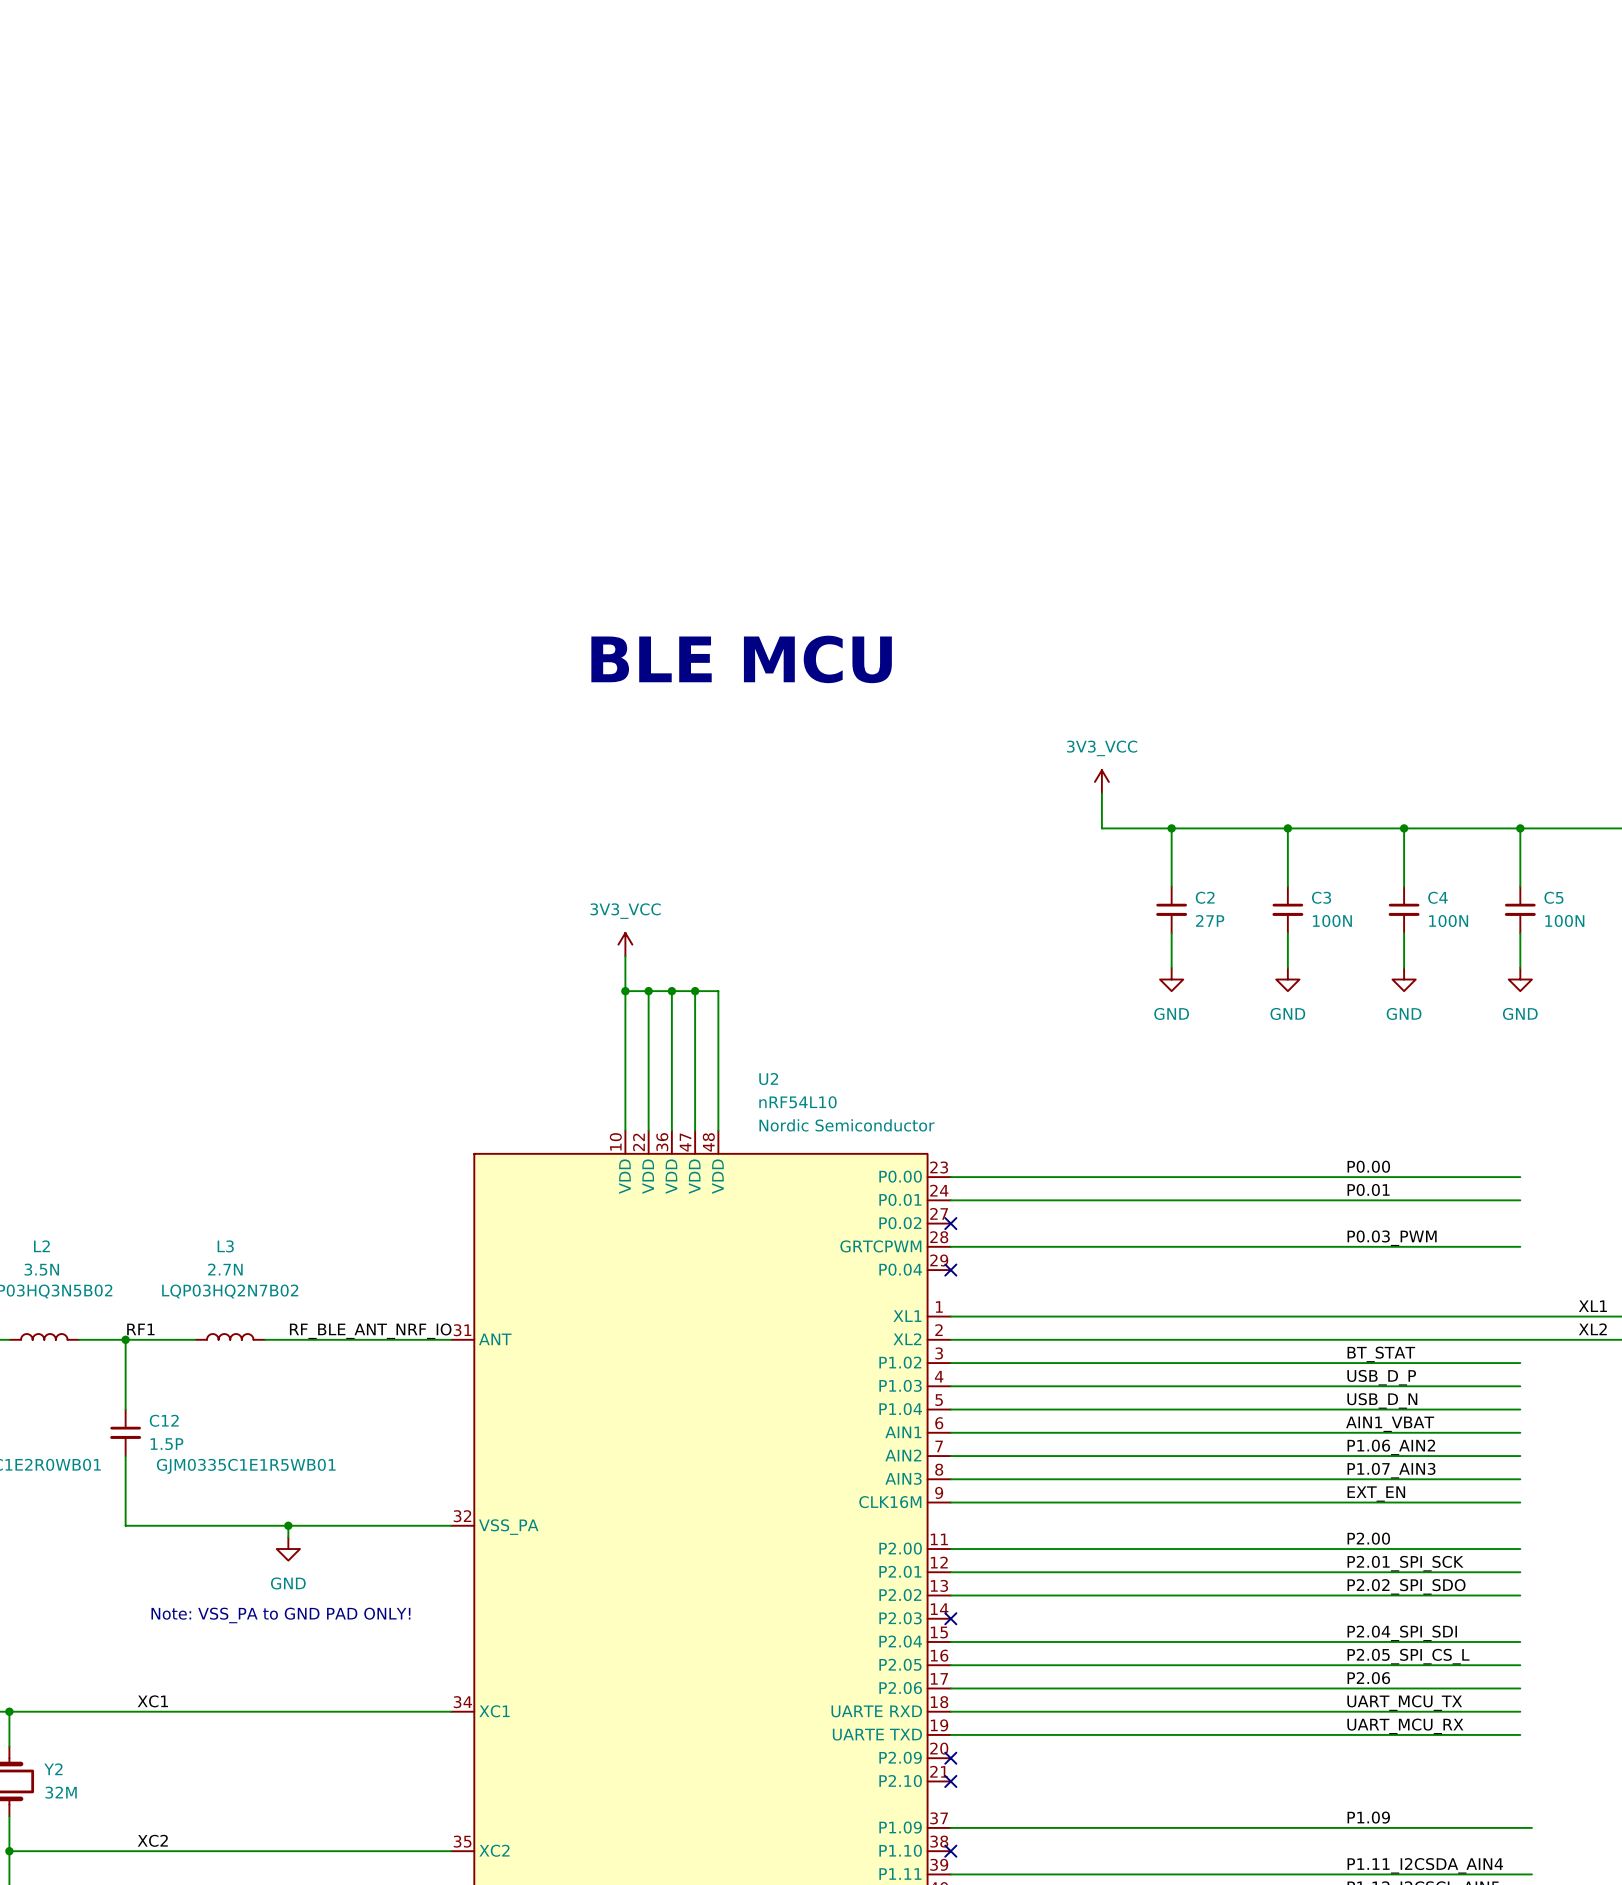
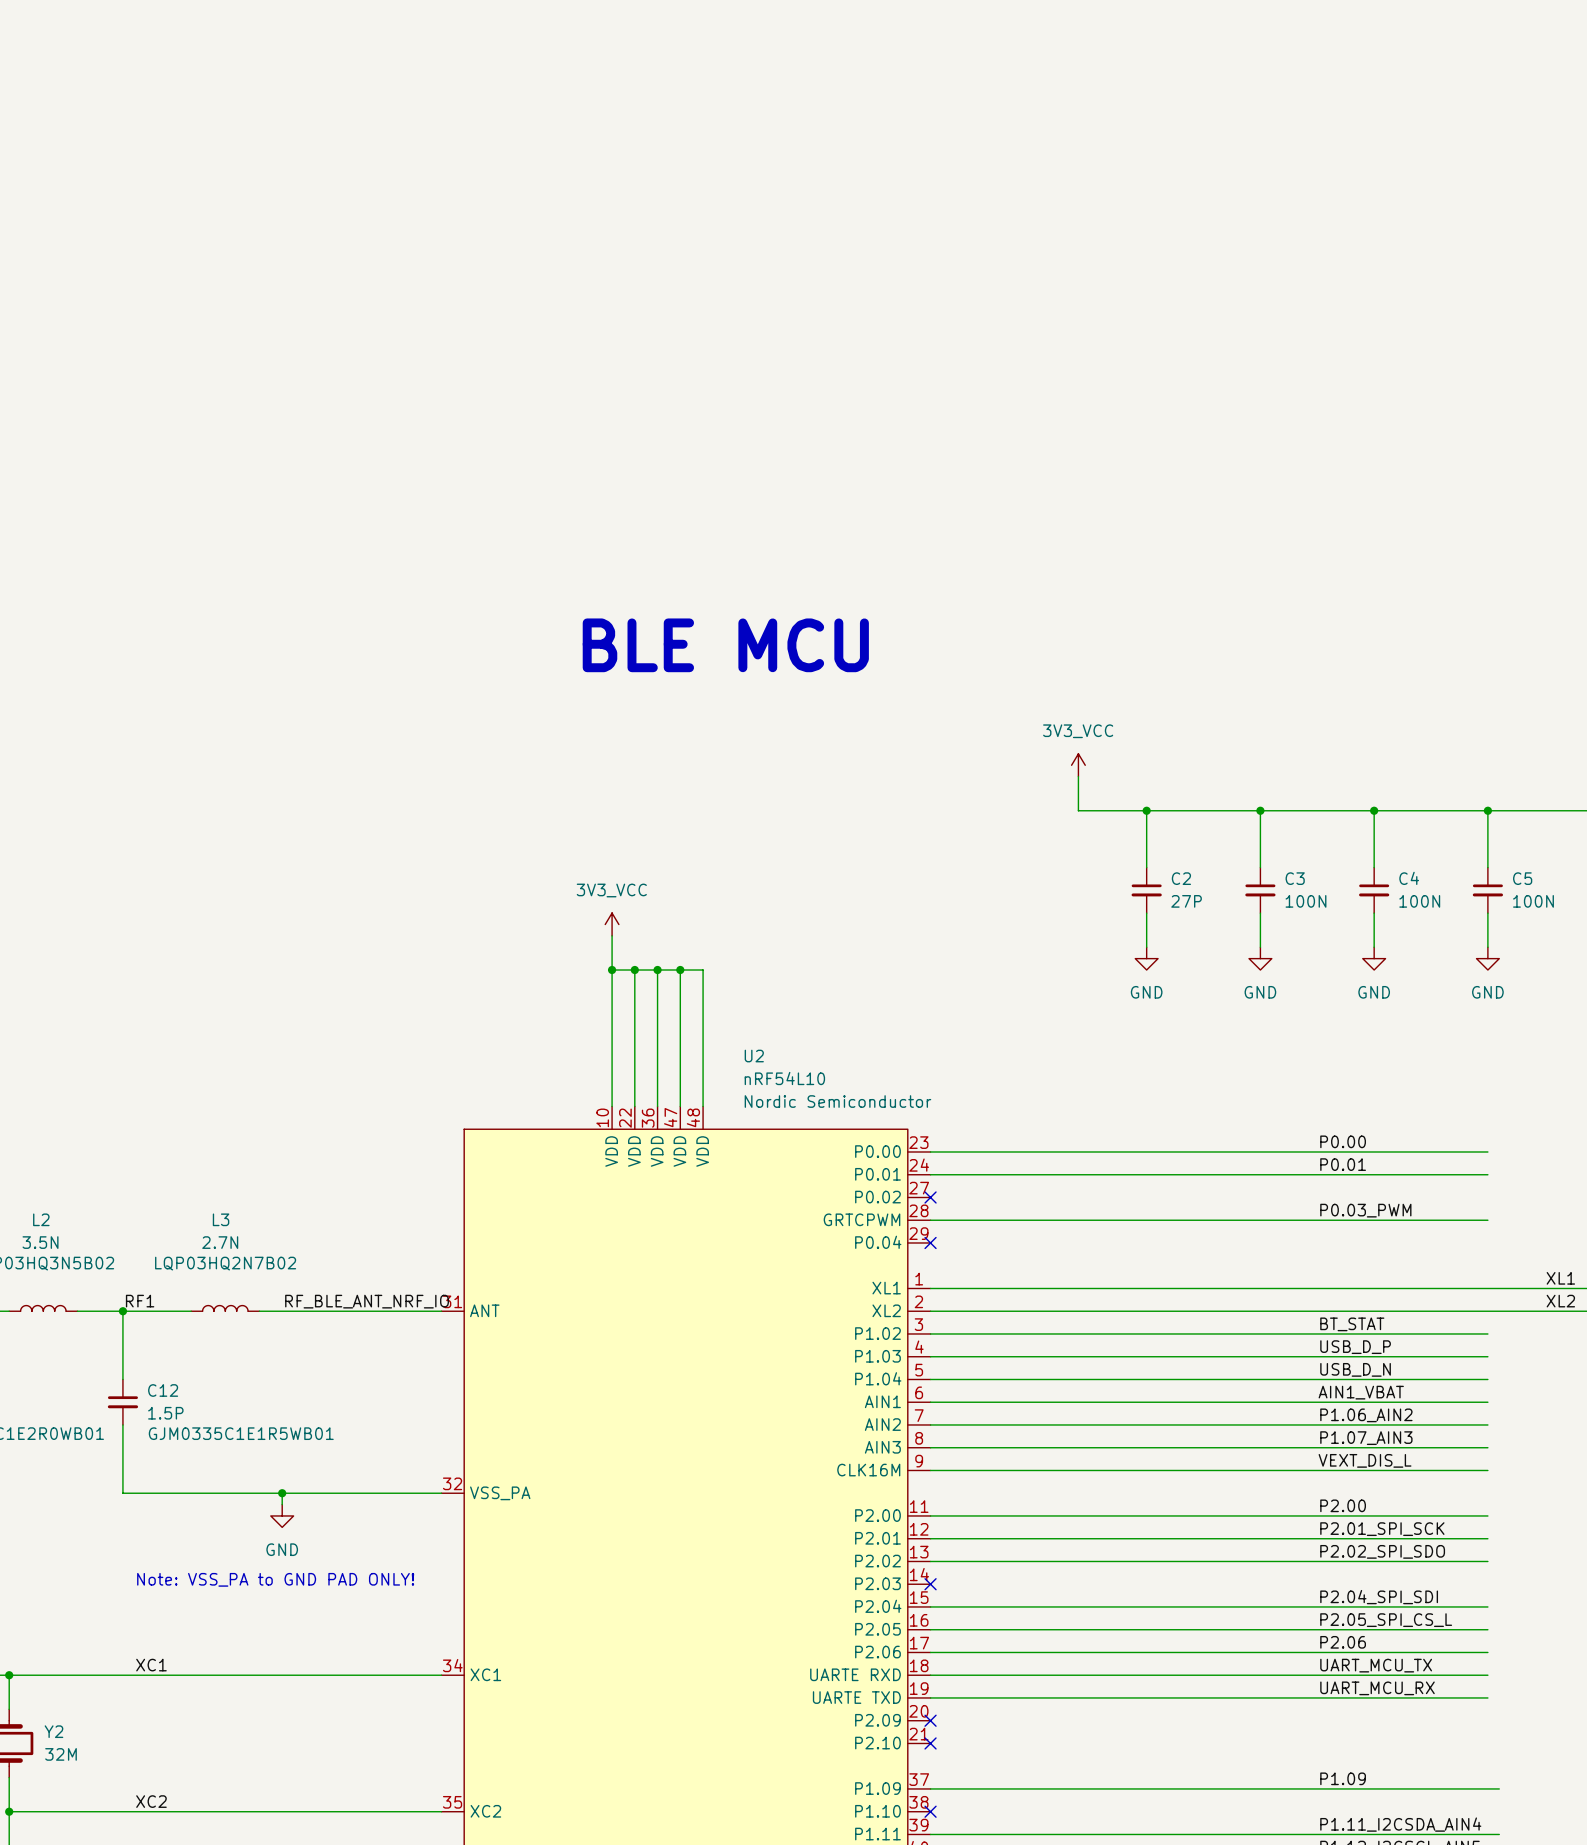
label: EXT_EN (1376, 1494) -> VEXT_DIS_L (1365, 1460)

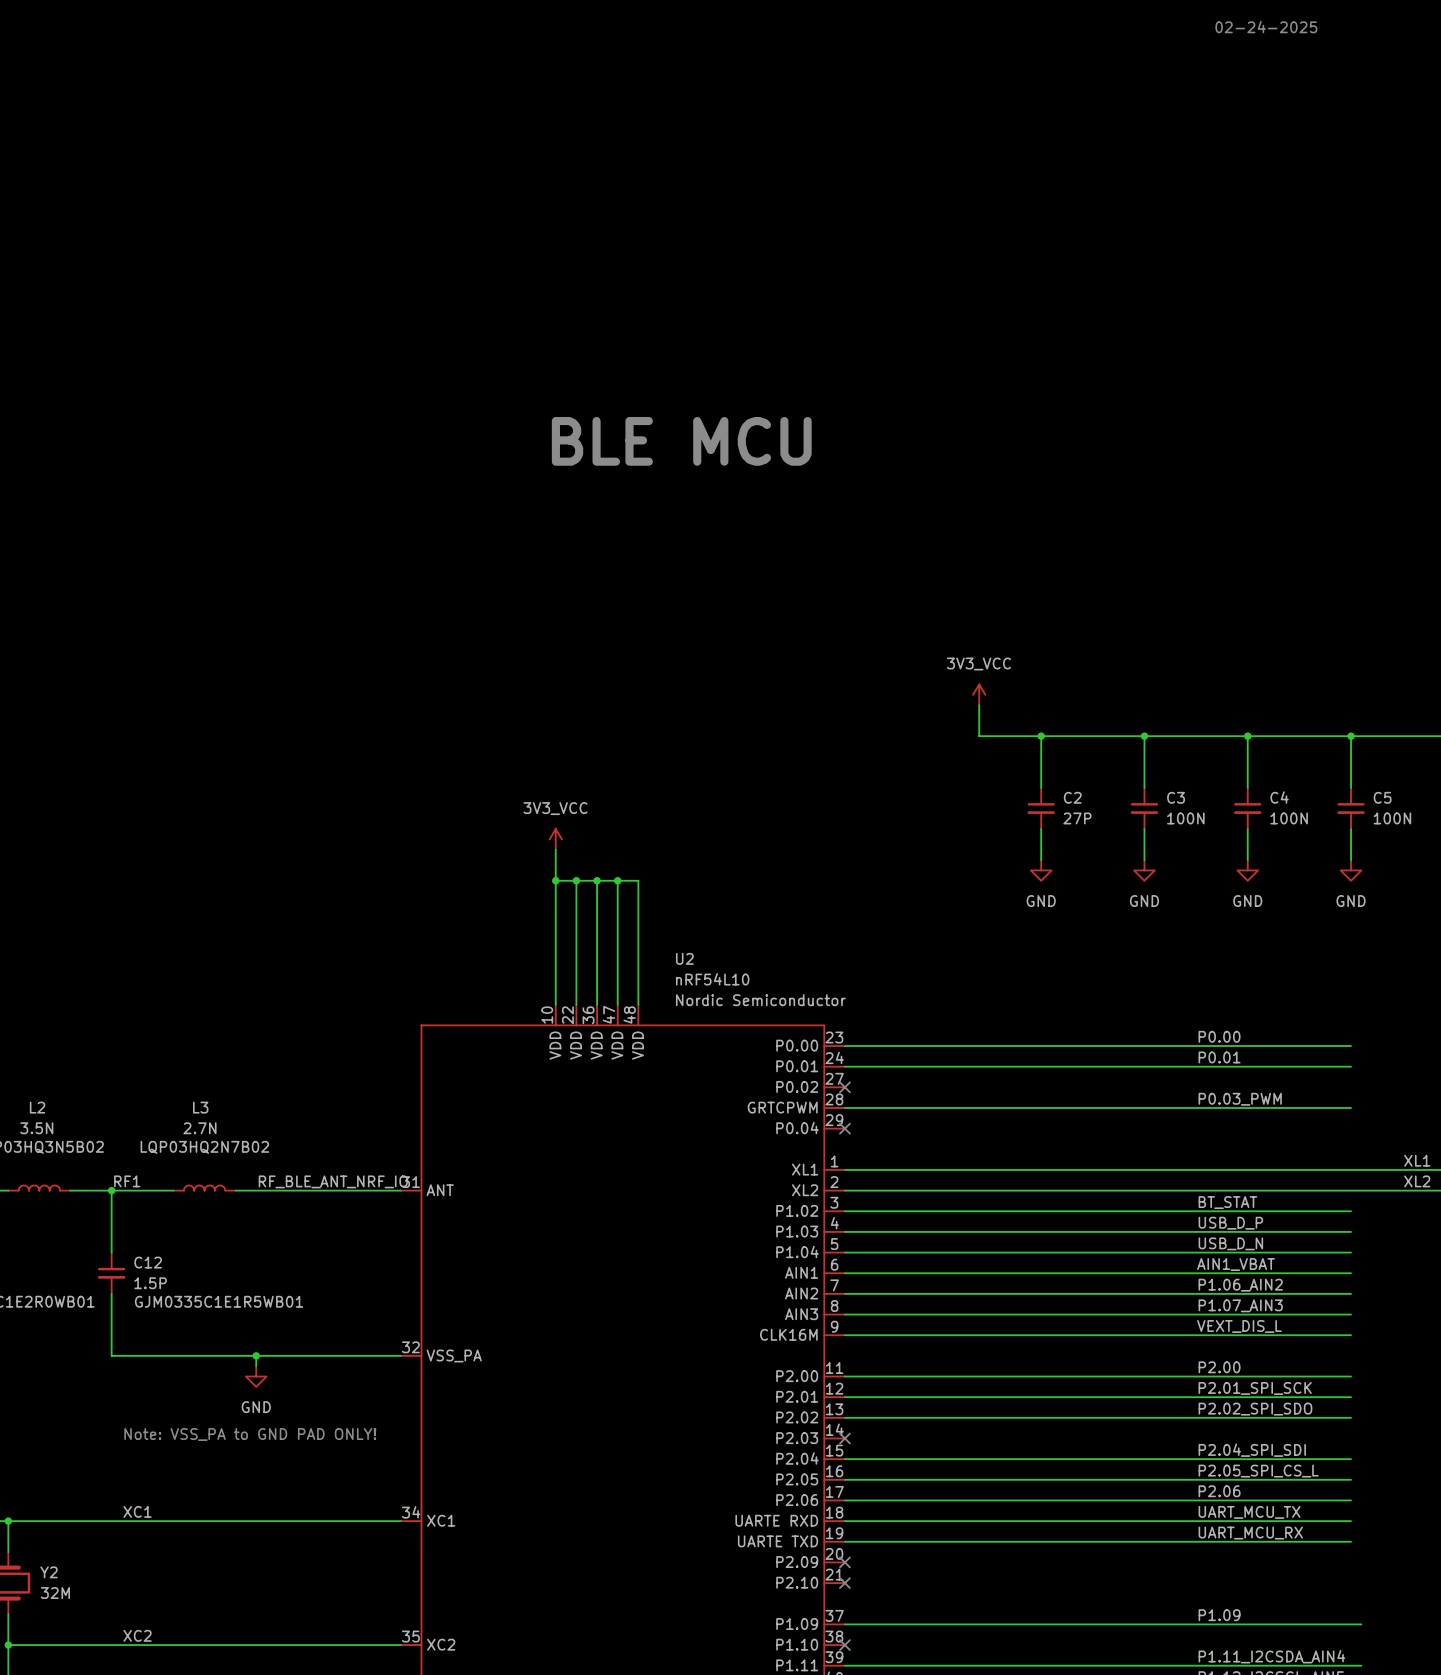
text: none -> 02-24-2025 (1266, 27)
text position: BLE MCU (725, 645) -> BLE MCU (681, 441)

